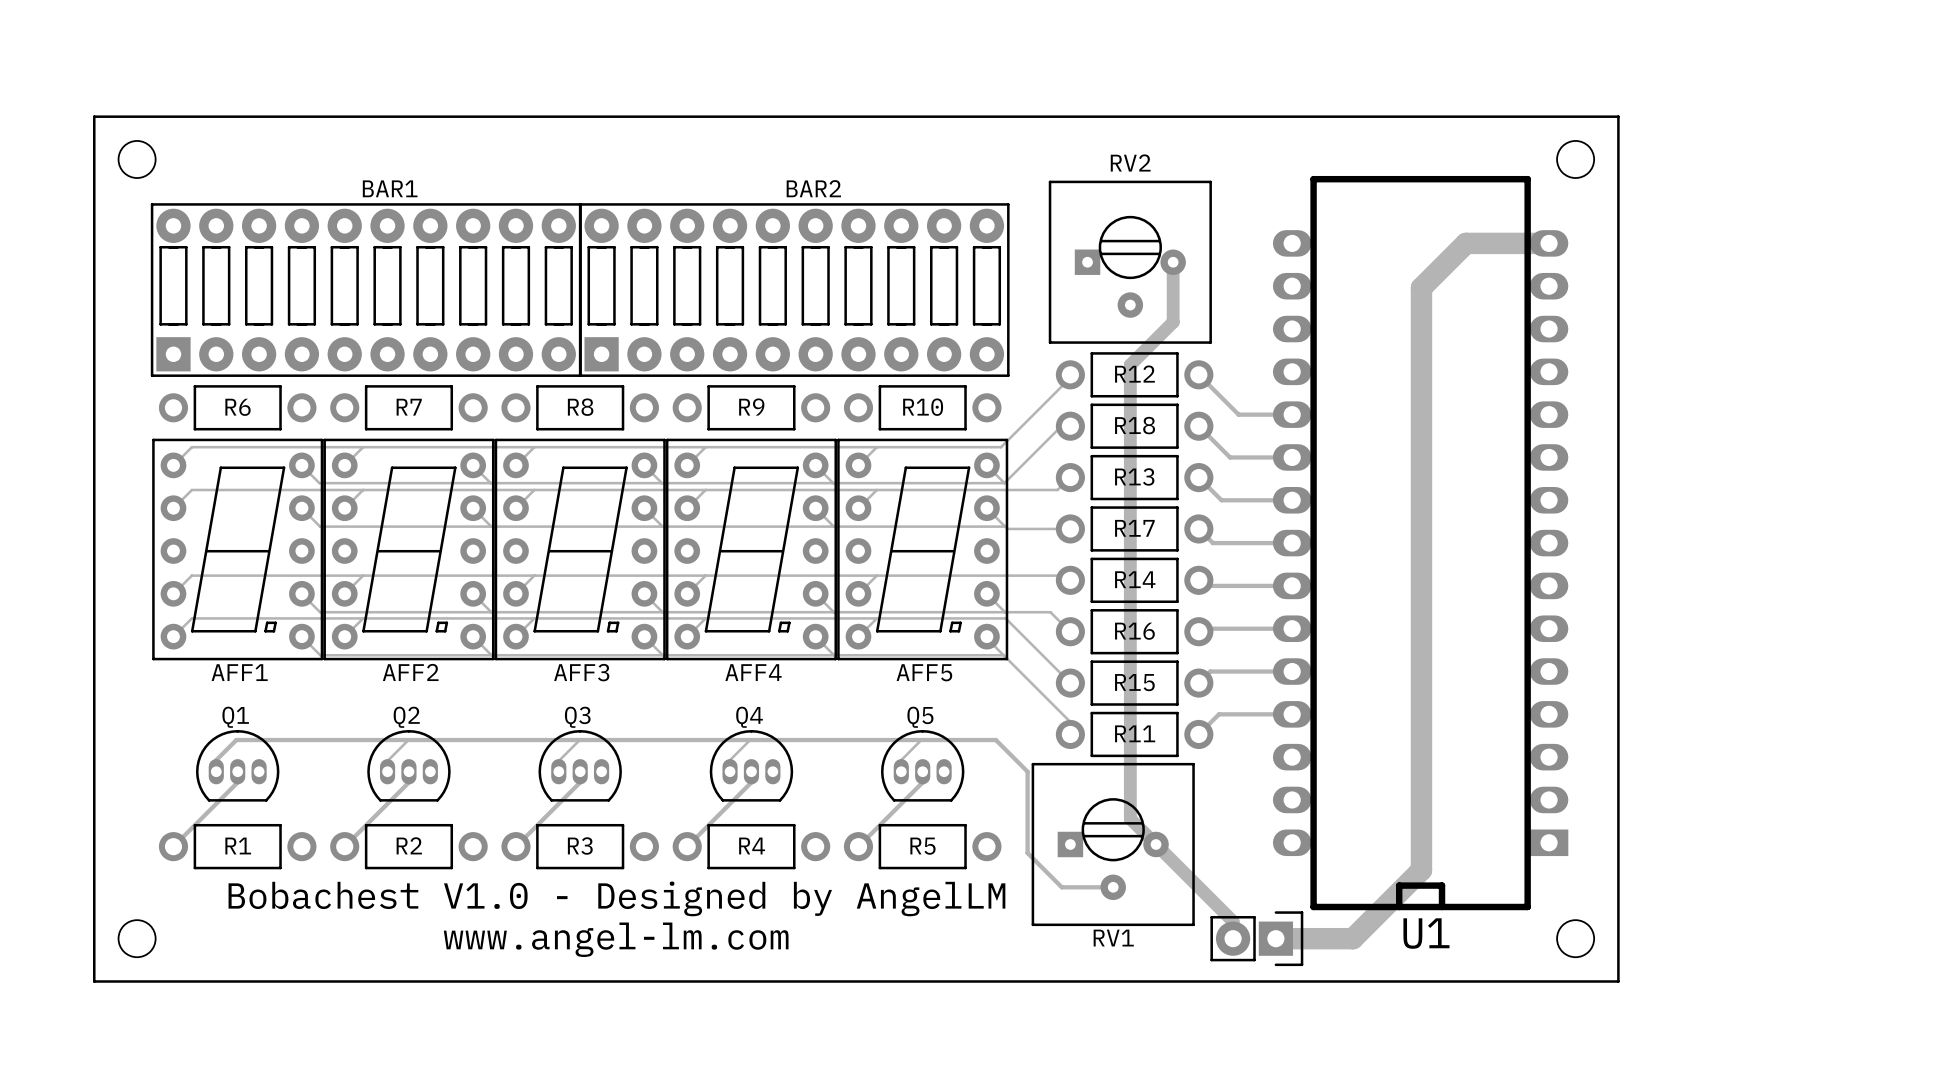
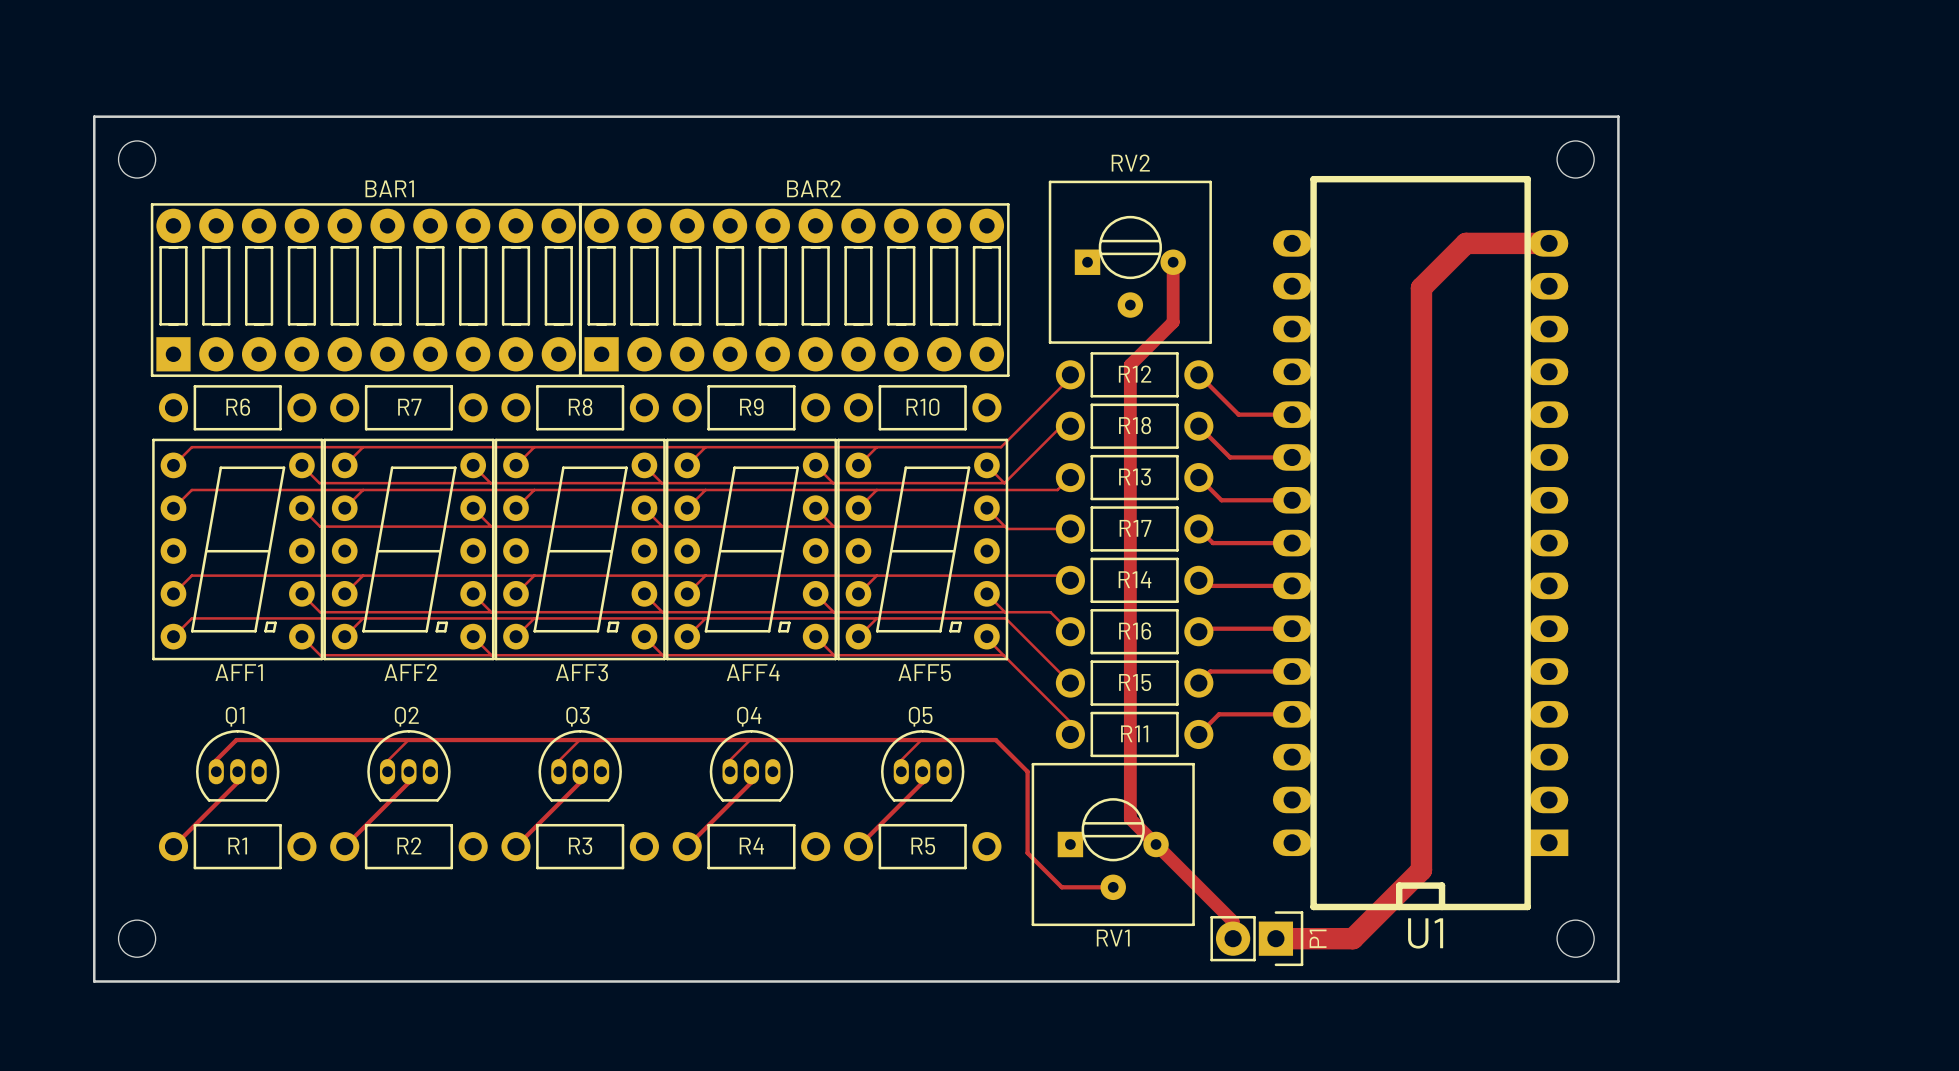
text: Bobachest V1.0 - Designed by AngelLM (616, 898) -> none
P1 name: none -> P1 (1318, 938)
text: www.angel-lm.com (616, 939) -> none

